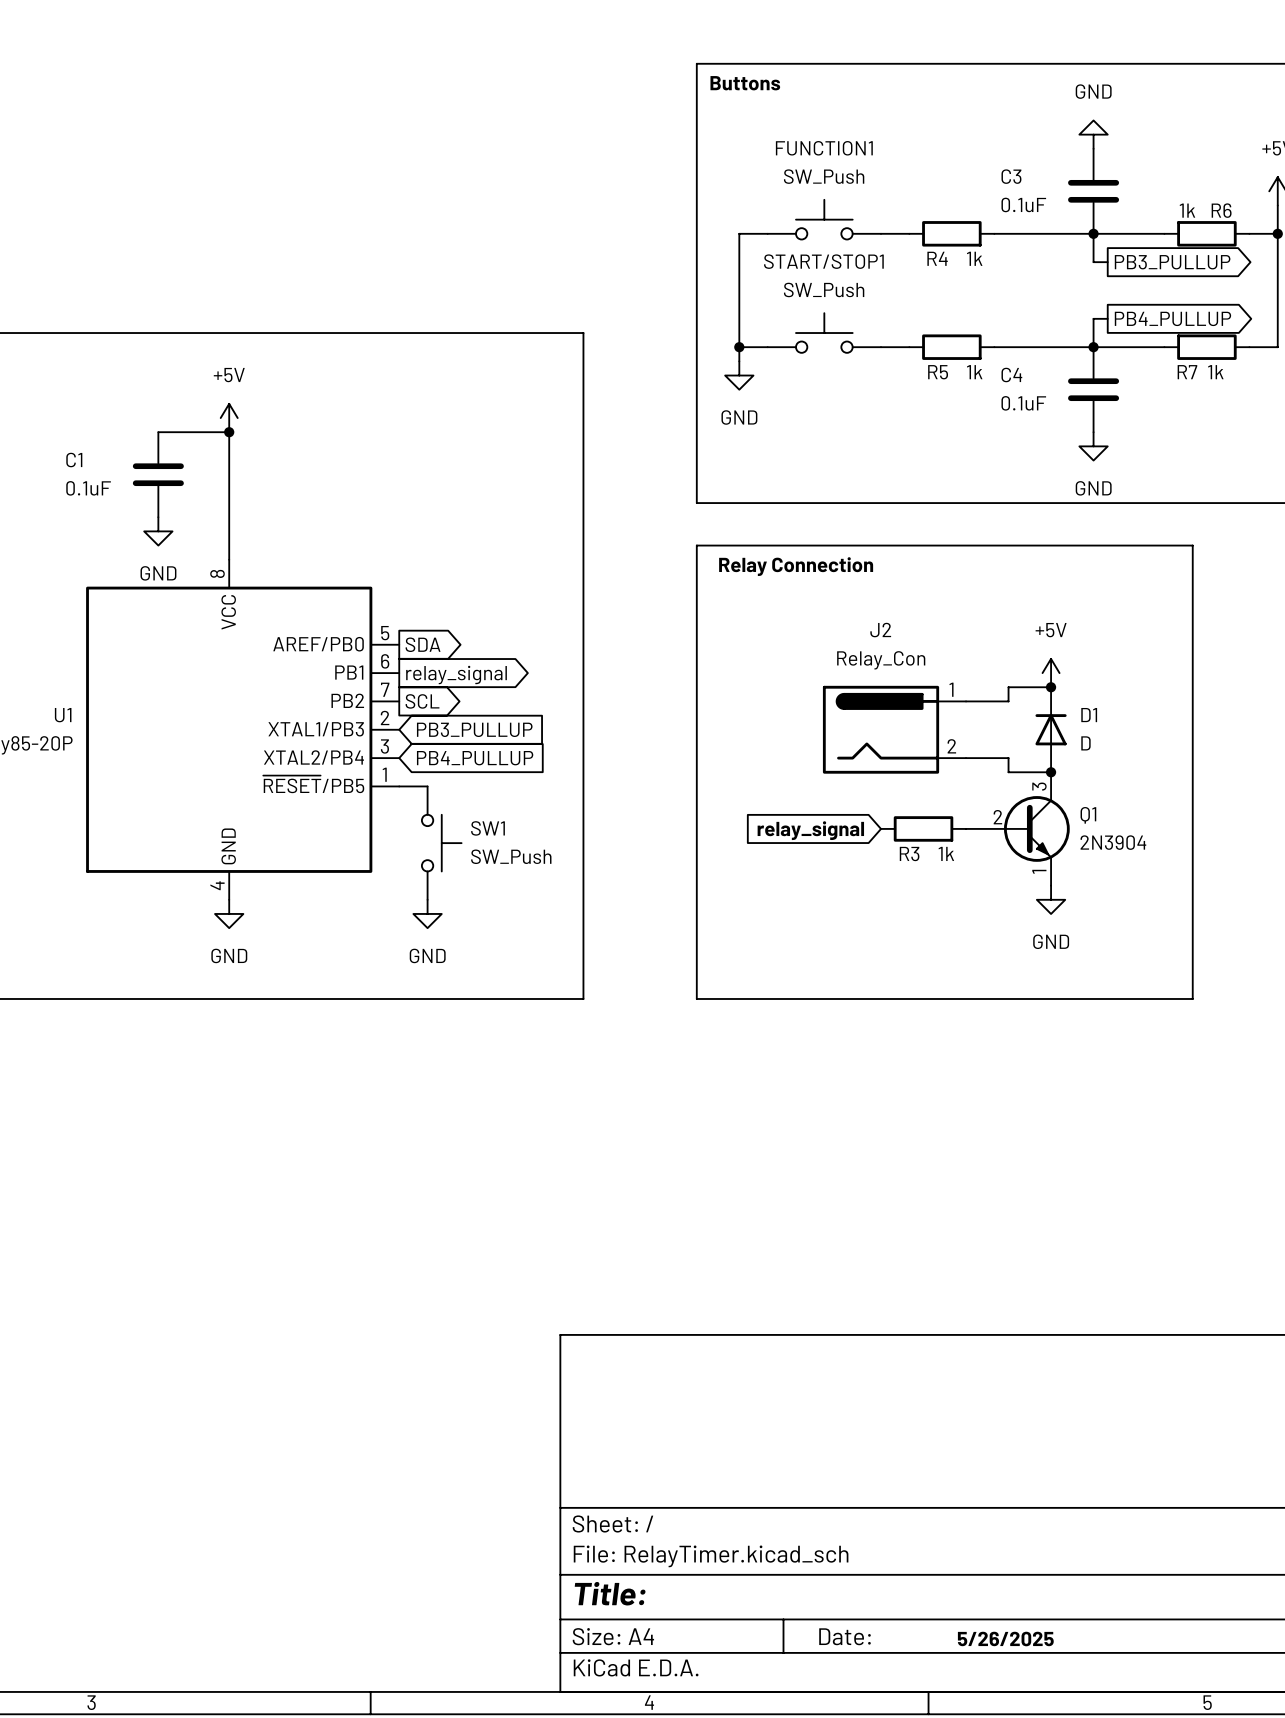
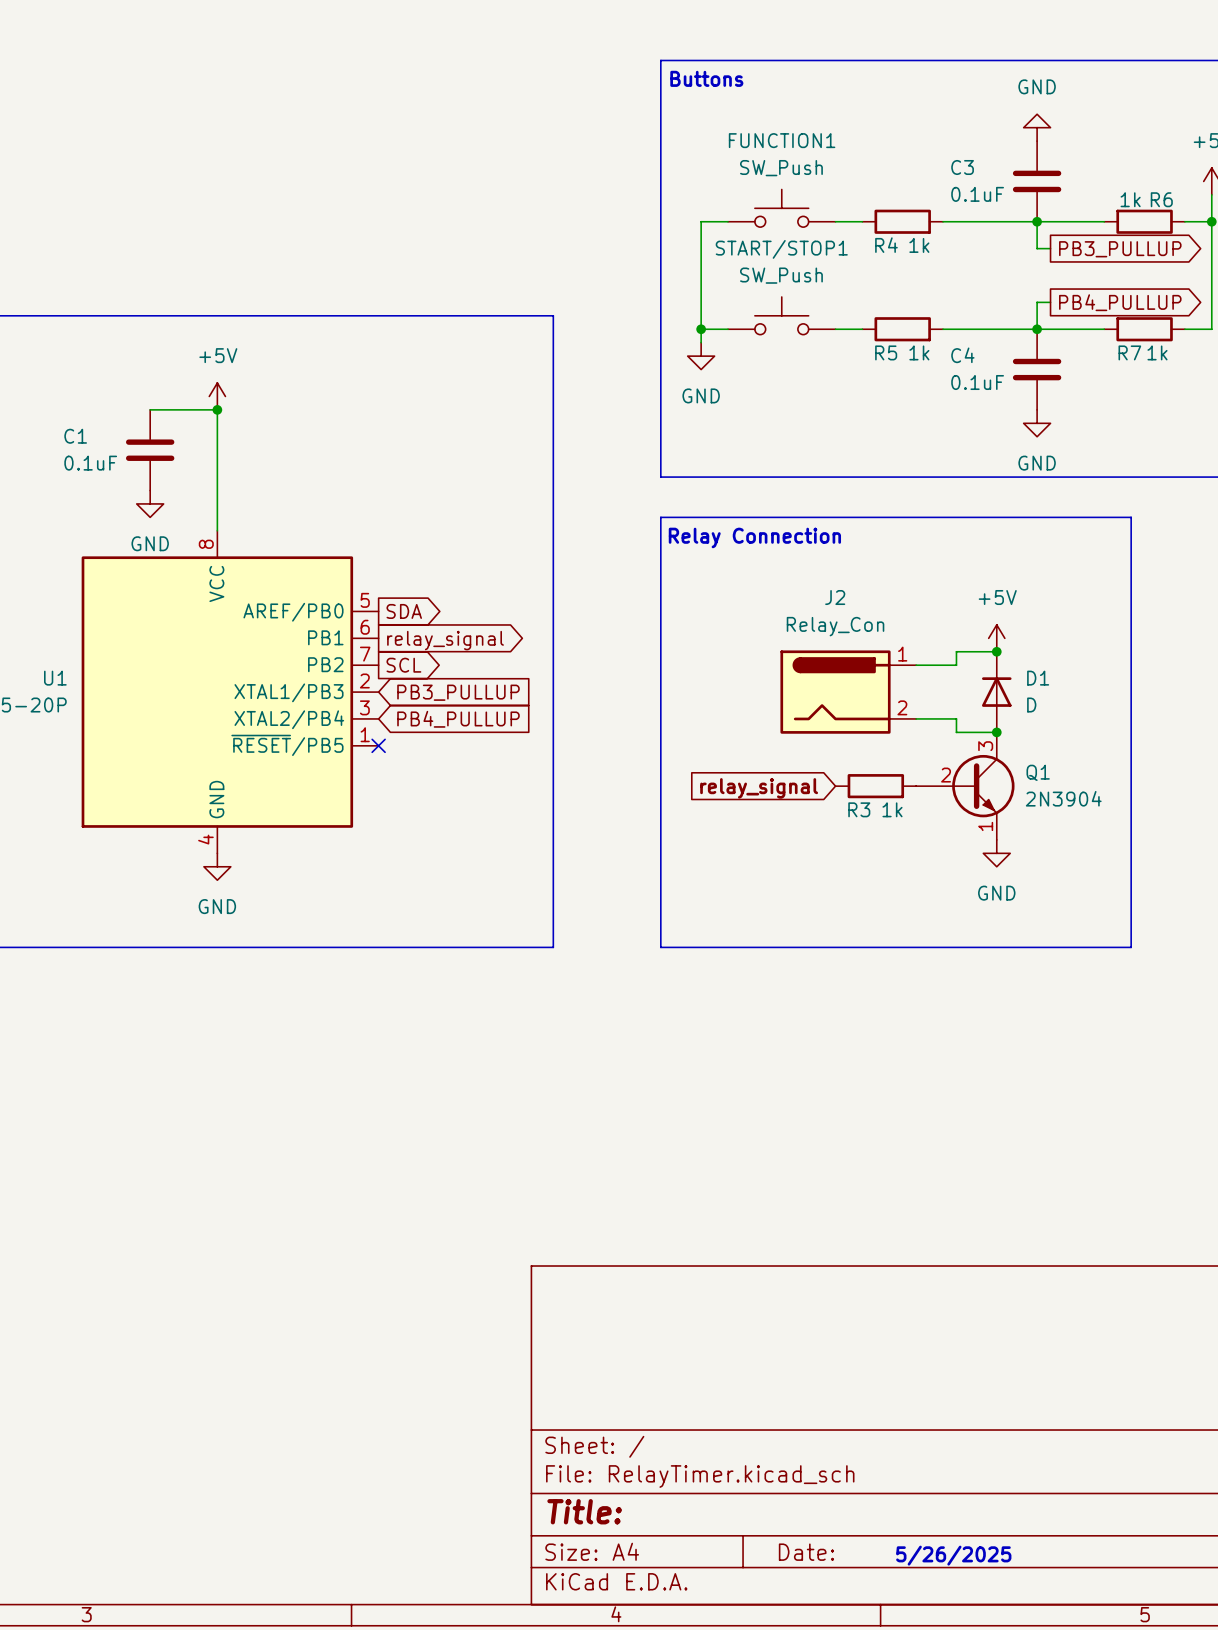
wire: (399, 786) (427, 786) -> none
no-connect mark: none -> (378, 745)
SW1: SW_Push (441, 843) -> none
power symbol: GND (427, 913) -> none

